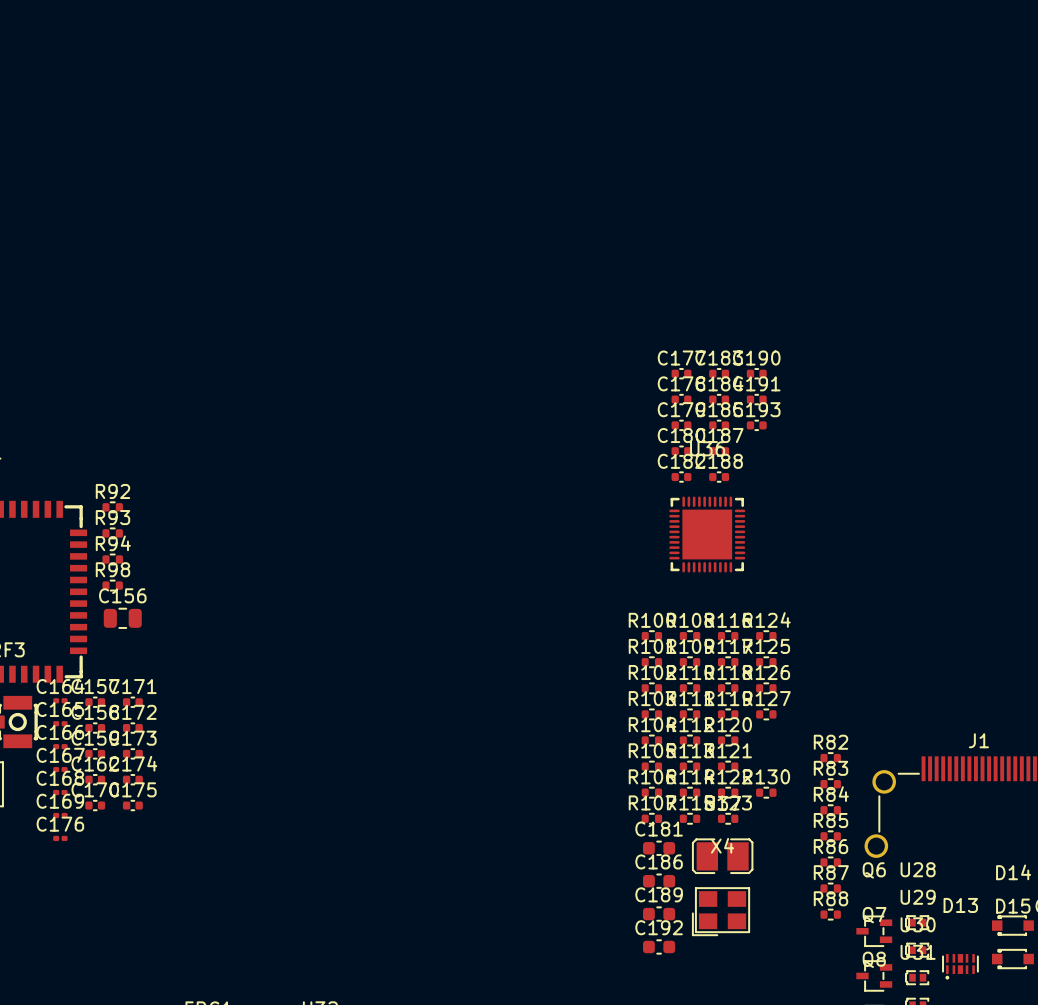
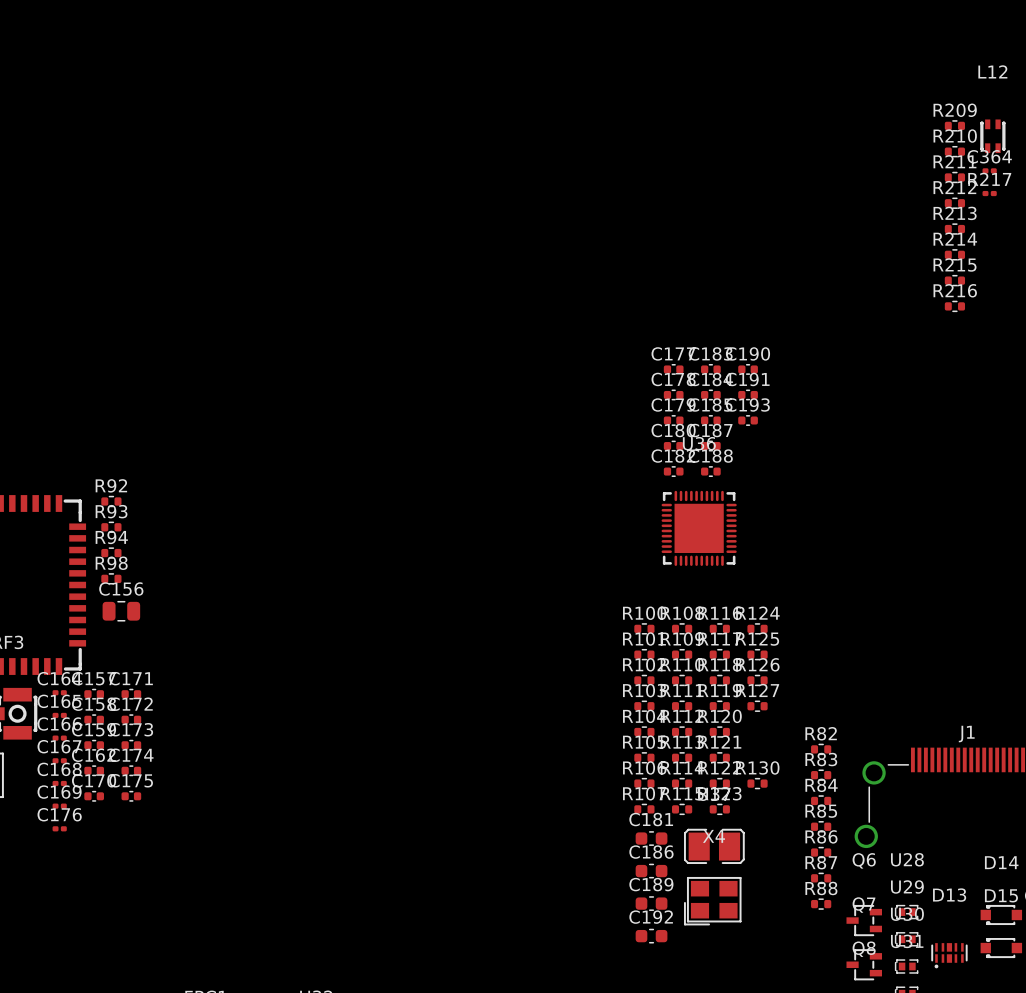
R209: none -> (954, 125)
L12: none -> (992, 136)
R210: none -> (954, 151)
C364: none -> (989, 170)
R211: none -> (954, 177)
R217: none -> (989, 193)
R212: none -> (954, 203)
R213: none -> (954, 229)
R214: none -> (954, 254)
R215: none -> (954, 280)
R216: none -> (954, 306)

